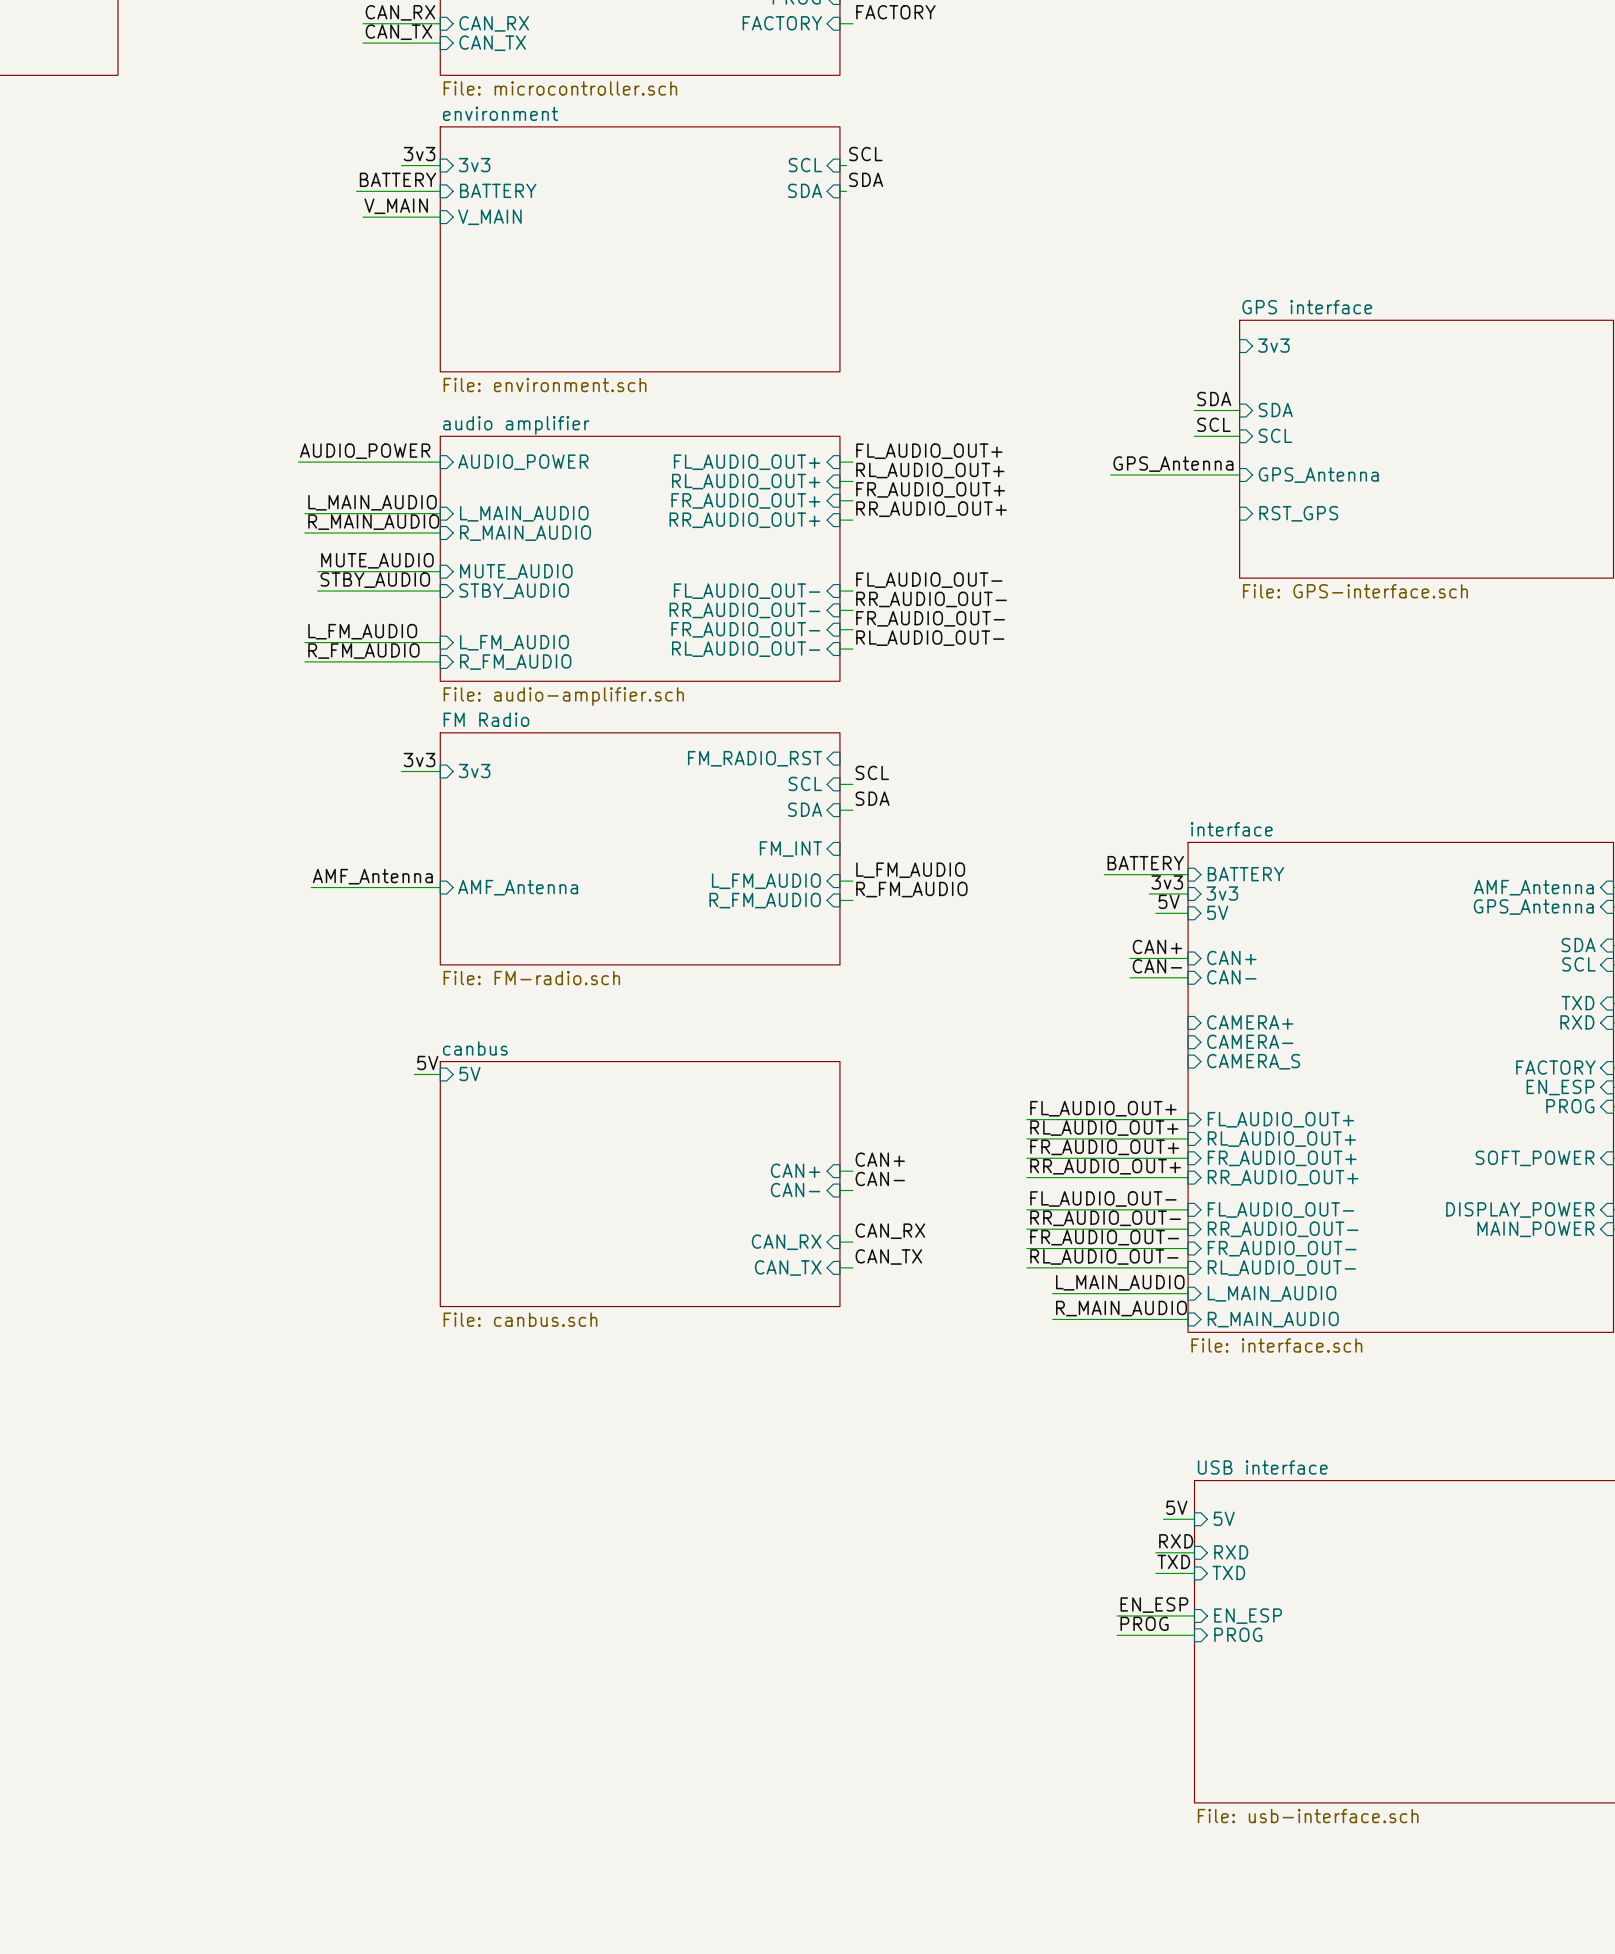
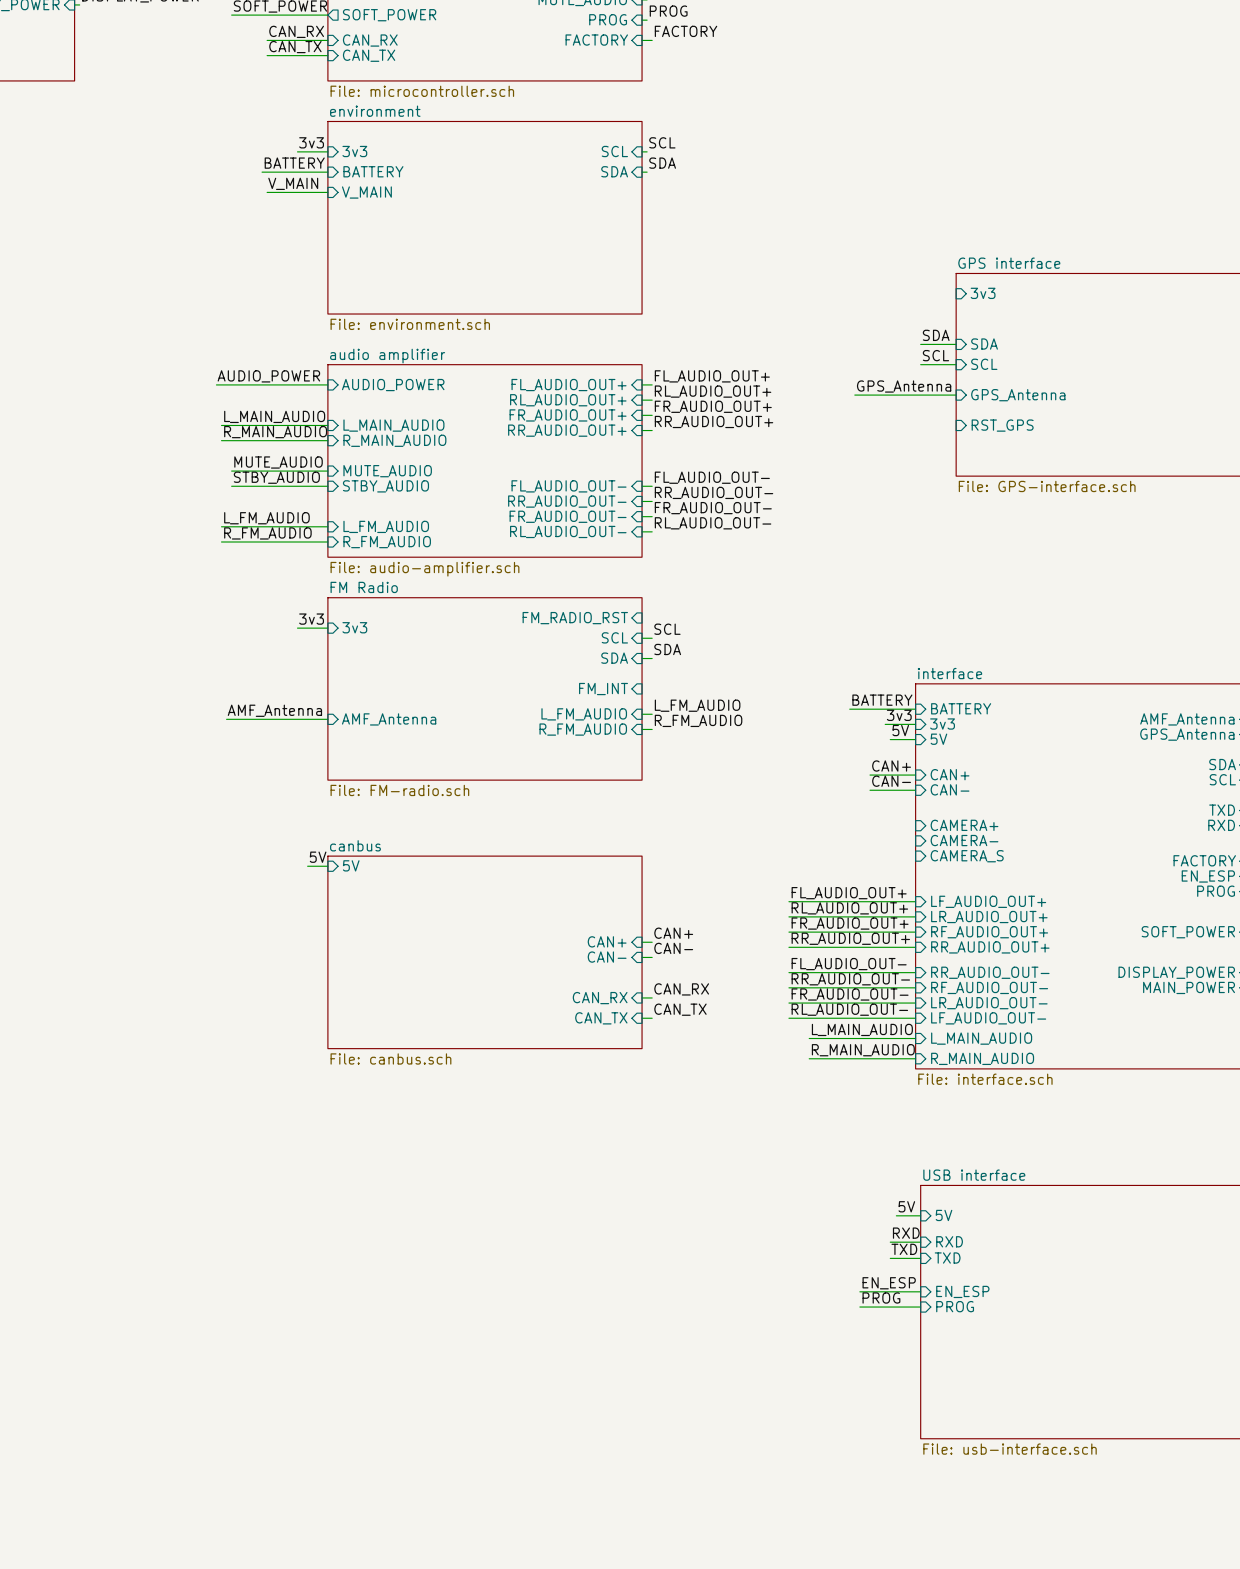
sheet pin: FL_AUDIO_OUT+ (1280, 1119) -> LF_AUDIO_OUT+ (988, 901)
sheet pin: RL_AUDIO_OUT+ (1281, 1139) -> LR_AUDIO_OUT+ (989, 917)
sheet pin: FR_AUDIO_OUT+ (1282, 1158) -> RF_AUDIO_OUT+ (989, 932)
sheet pin: FL_AUDIO_OUT- (1280, 1209) -> RR_AUDIO_OUT- (990, 972)
sheet pin: RR_AUDIO_OUT- (1283, 1229) -> RF_AUDIO_OUT- (989, 987)
sheet pin: FR_AUDIO_OUT- (1282, 1248) -> LR_AUDIO_OUT- (989, 1003)
sheet pin: RL_AUDIO_OUT- (1281, 1268) -> LF_AUDIO_OUT- (988, 1018)

